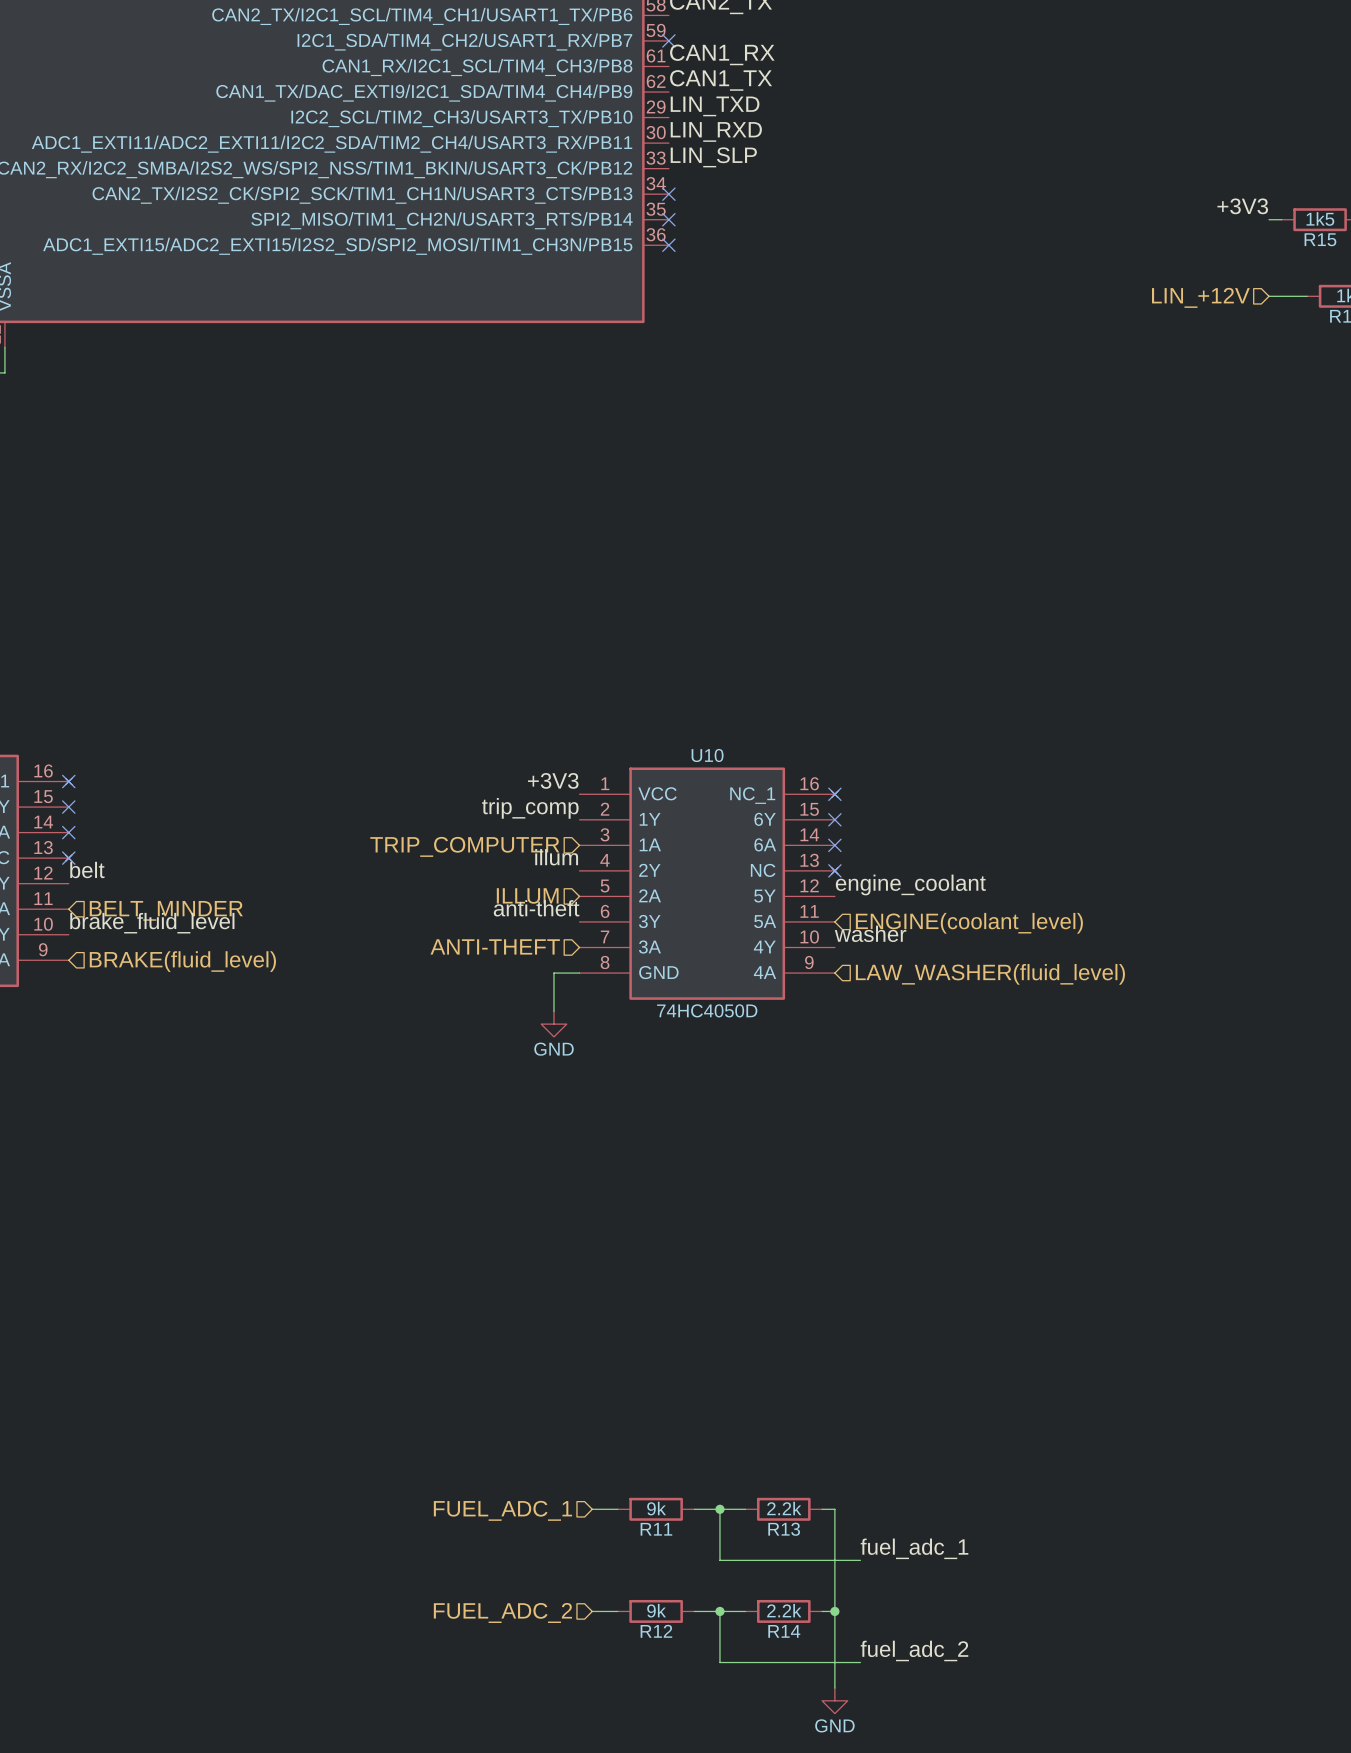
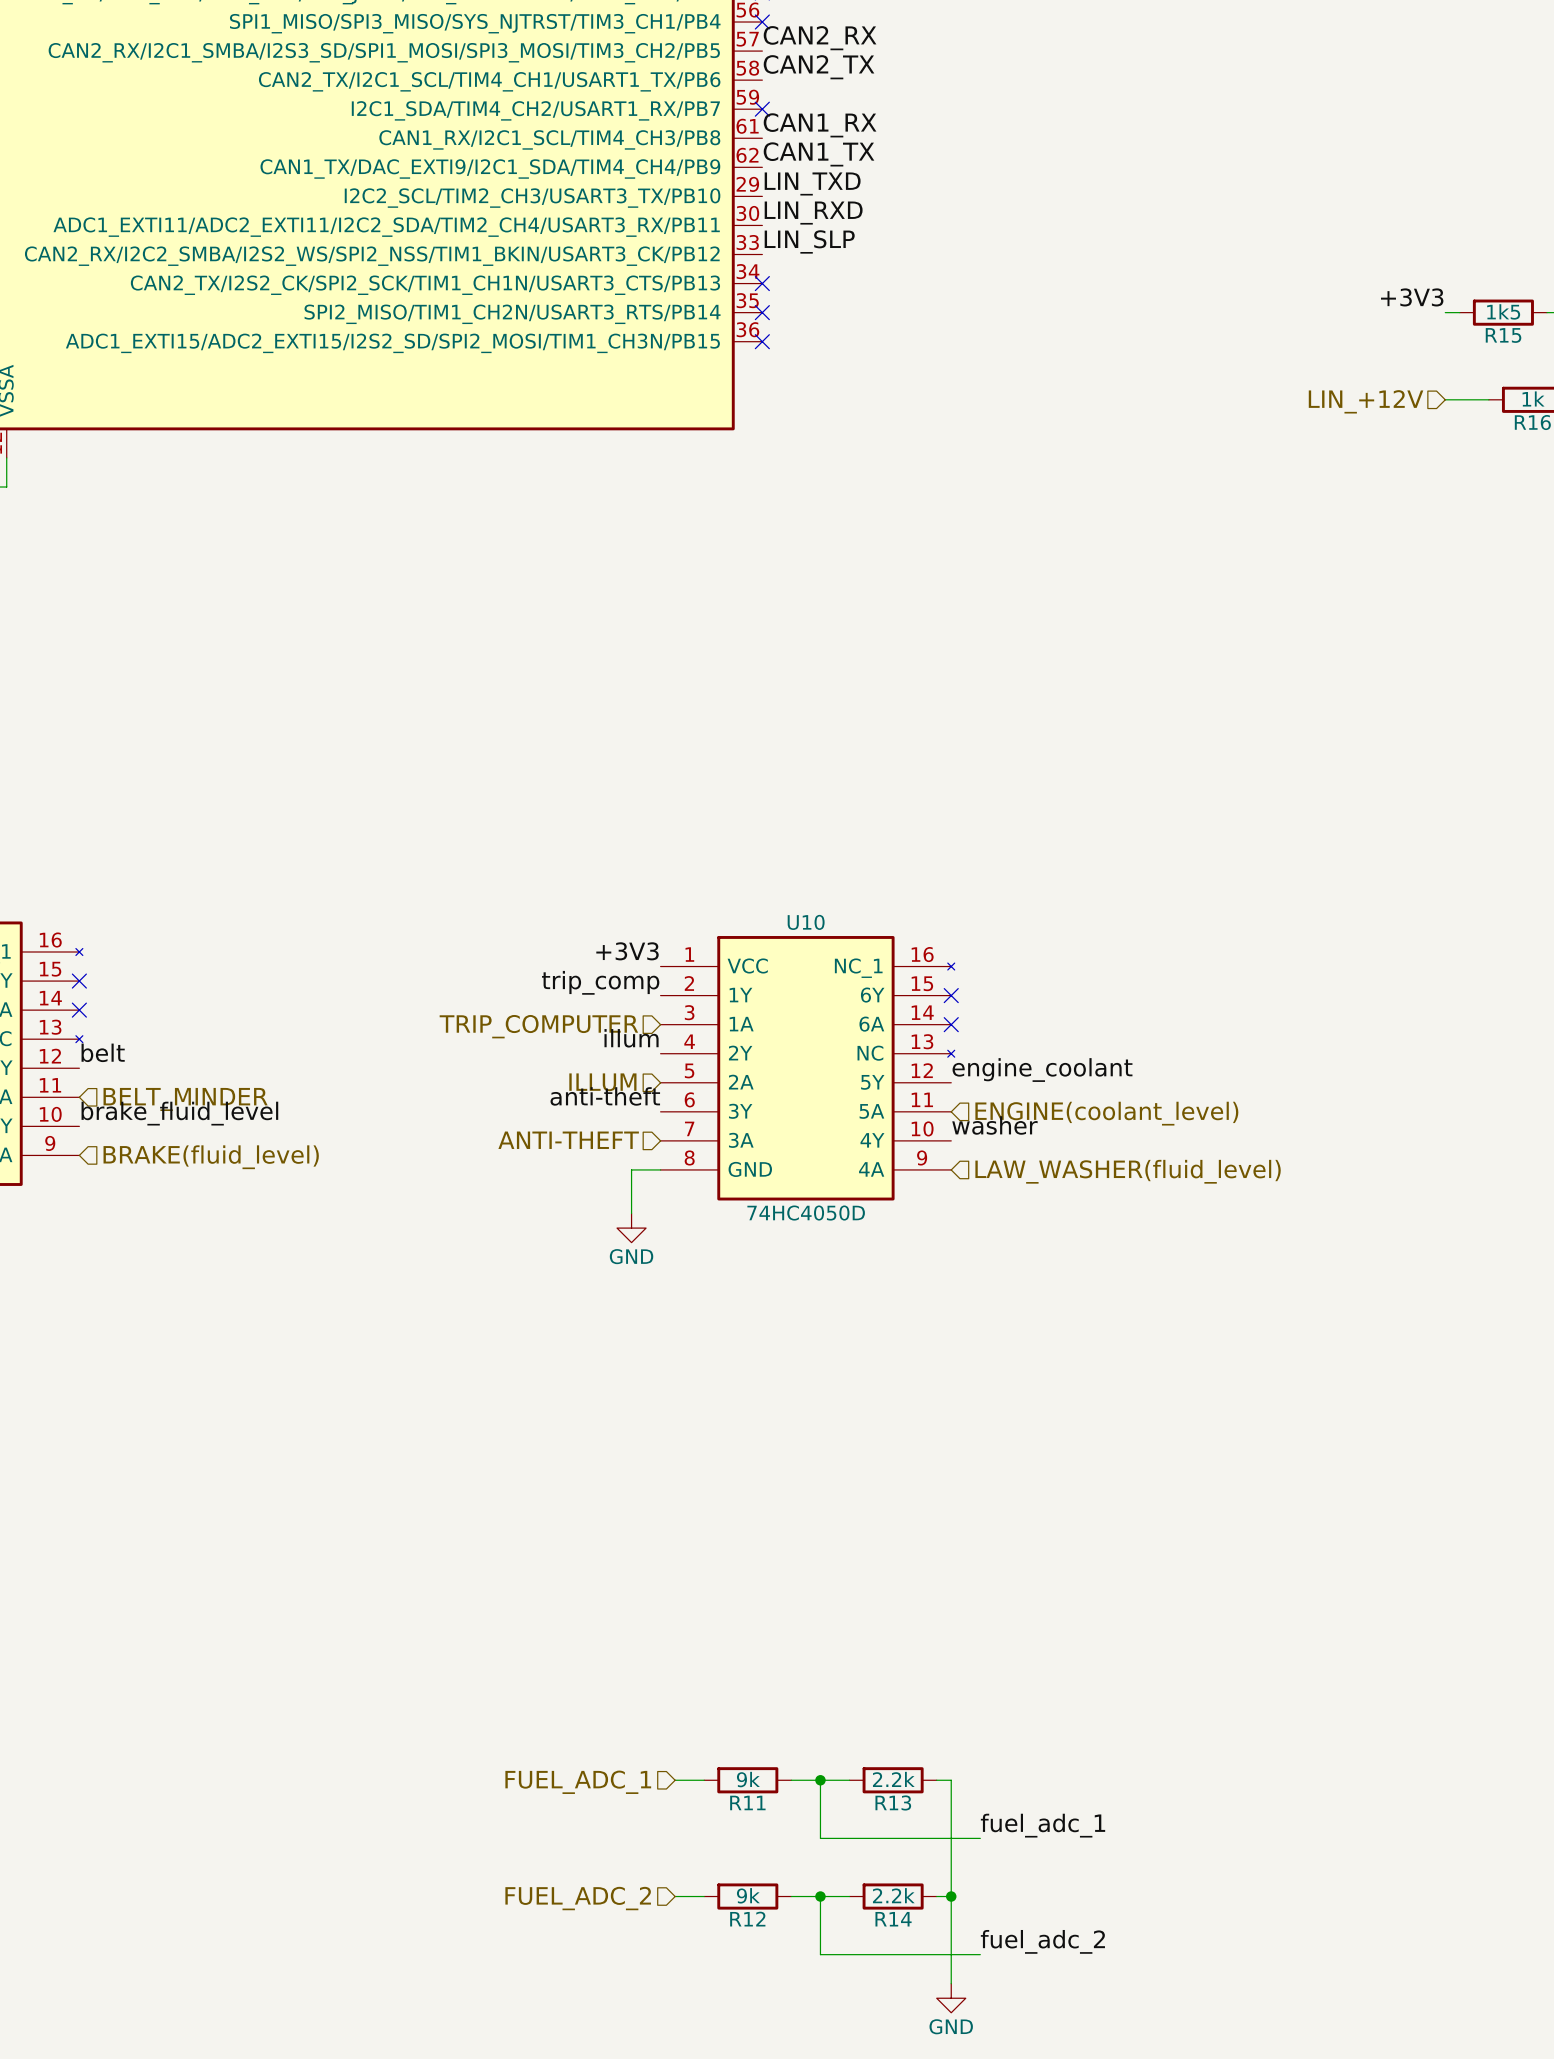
no-connect mark: (68, 781) -> none
no-connect mark: (834, 794) -> none
no-connect mark: (68, 858) -> none
no-connect mark: (834, 870) -> none

